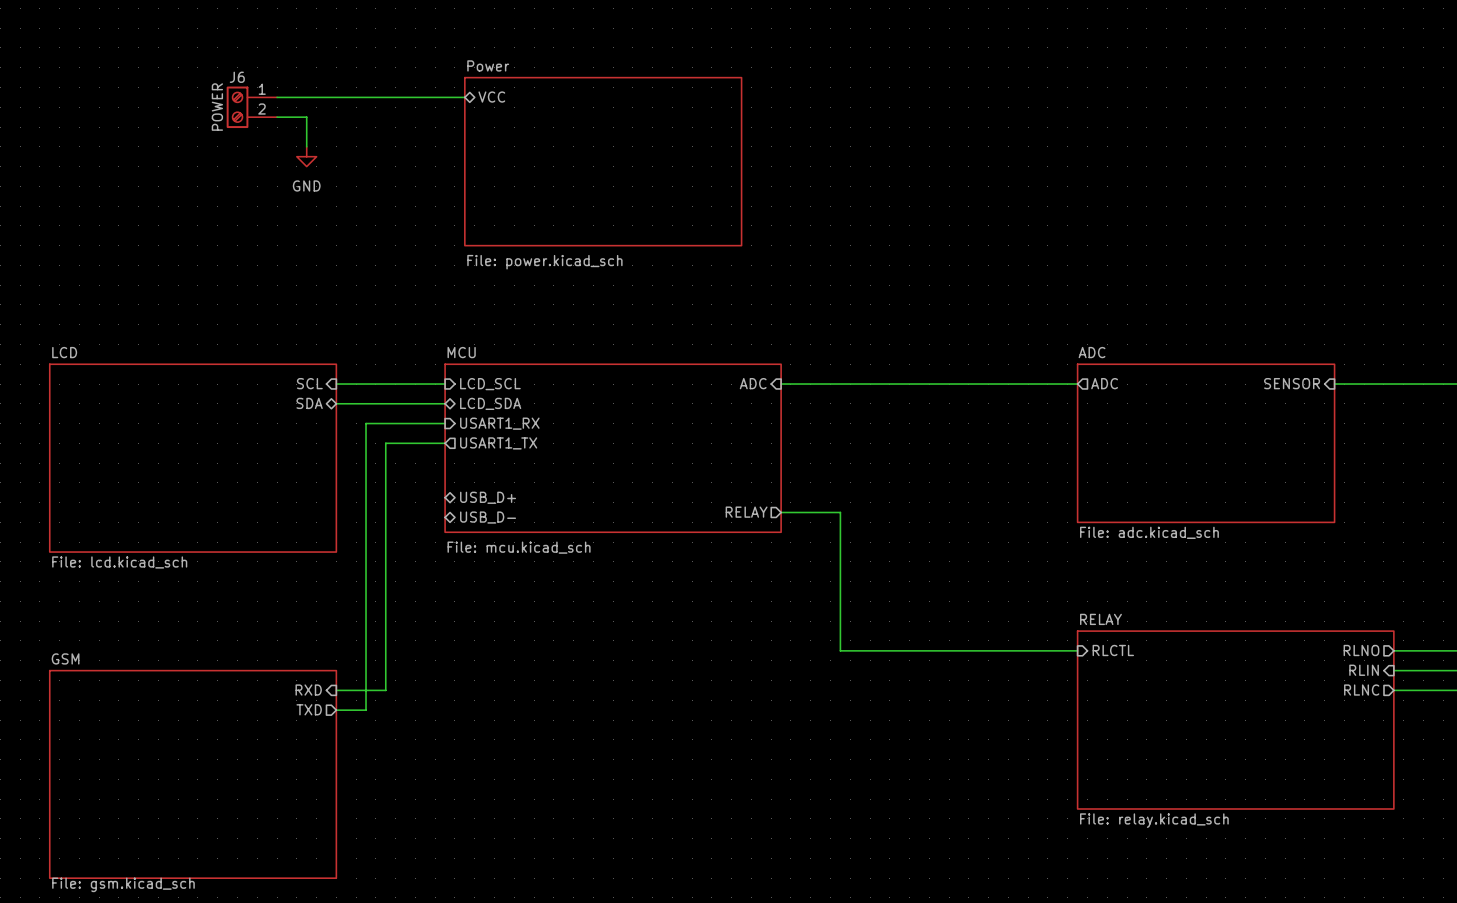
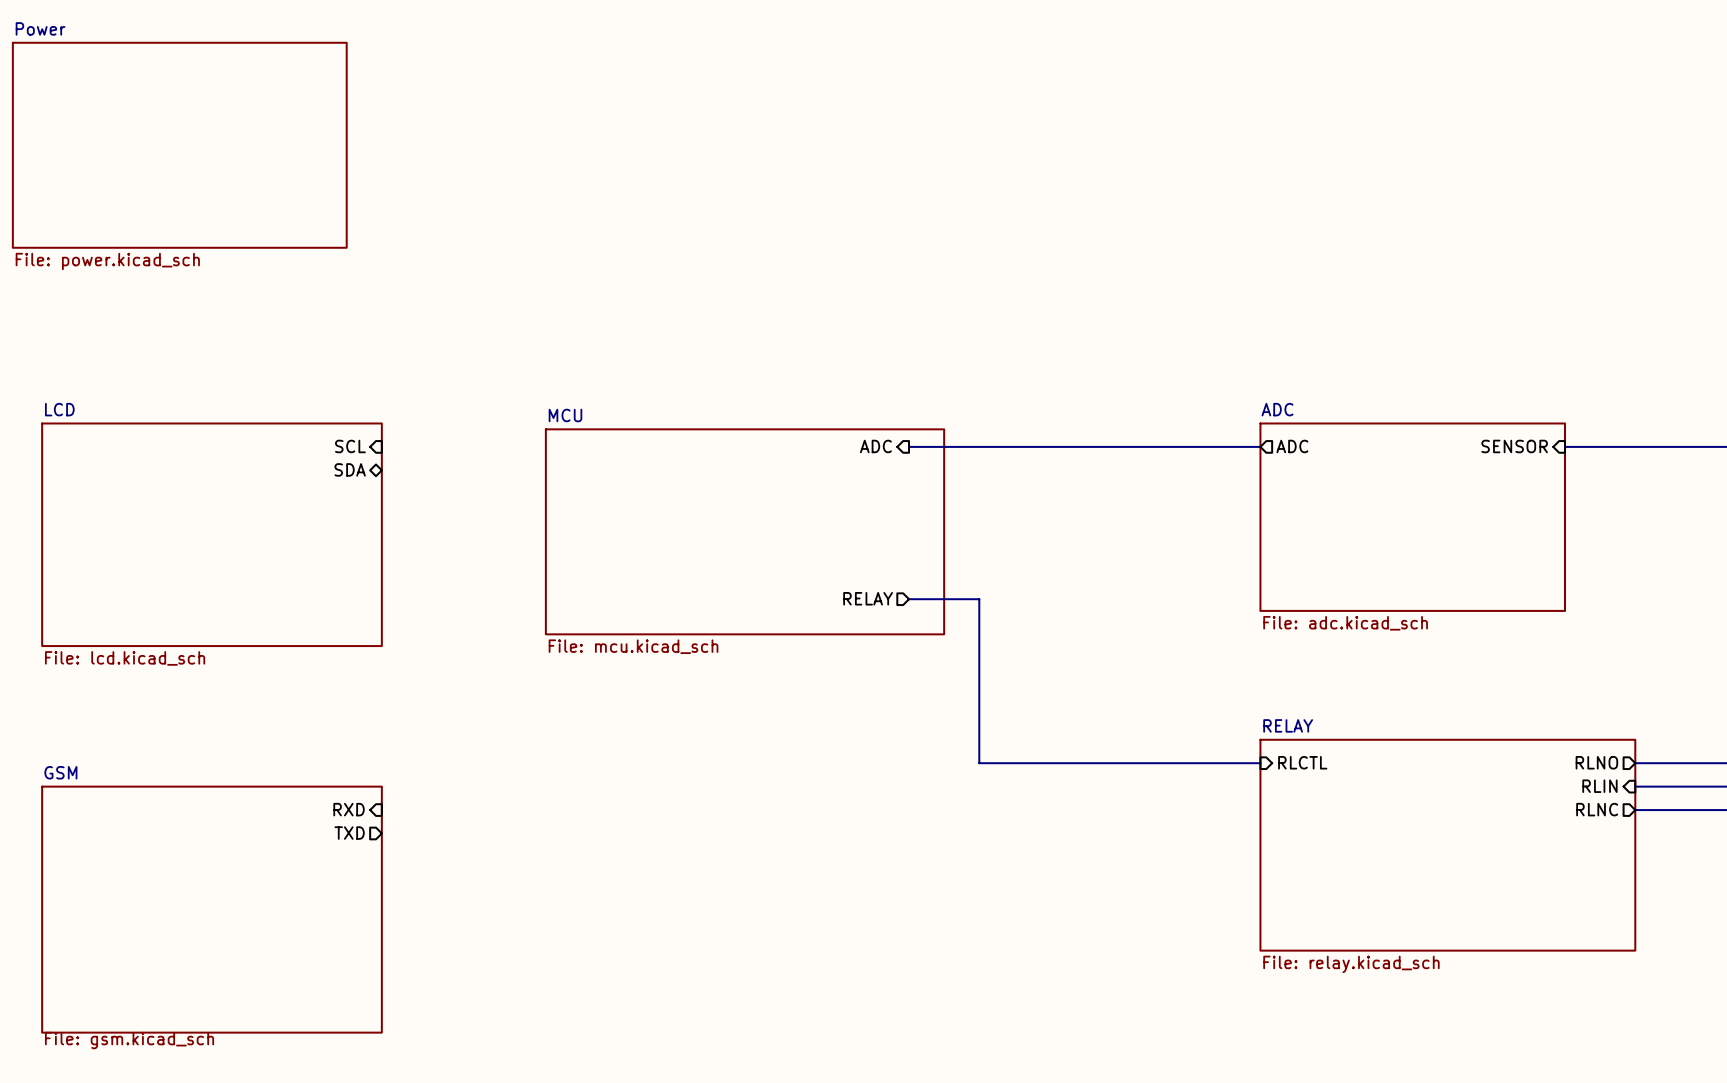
wire: (277, 97) (464, 97) -> none
sheet pin: VCC (491, 97) -> none
J6: POWER (251, 107) -> none
wire: (277, 117) (306, 117) (306, 146) -> none
sheet Power: none -> File: power.kicad_sch (179, 145)
power symbol: GND (306, 156) -> none
sheet Power: File: power.kicad_sch (603, 161) -> none
wire: (336, 384) (445, 384) -> none
sheet pin: LCD_SCL (490, 384) -> none
wire: (336, 403) (445, 403) -> none
sheet pin: LCD_SDA (490, 403) -> none
wire: (445, 423) (366, 423) (366, 710) (336, 710) -> none
sheet pin: USART1_RX (499, 423) -> none
wire: (445, 443) (385, 443) (385, 690) (336, 690) -> none
sheet pin: USART1_TX (498, 443) -> none
sheet MCU: File: mcu.kicad_sch (613, 448) -> none
sheet MCU: none -> File: mcu.kicad_sch (745, 531)
sheet pin: USB_D+ (488, 497) -> none
sheet pin: USB_D- (488, 517) -> none

